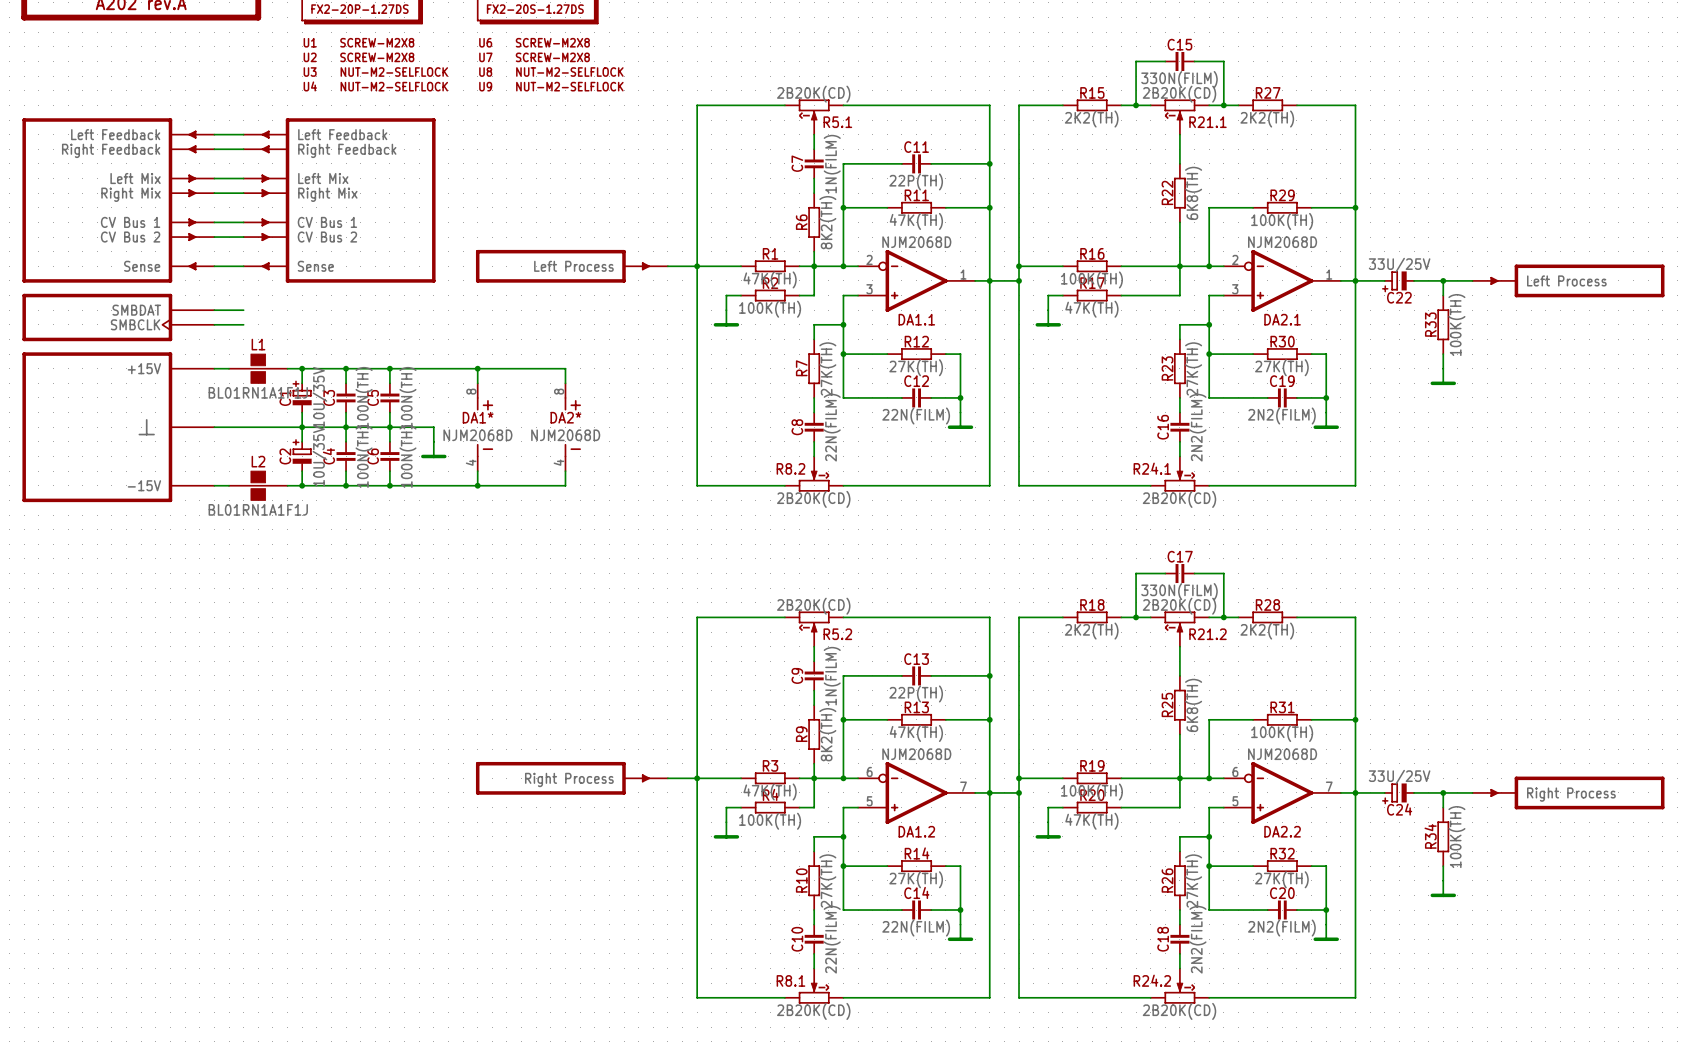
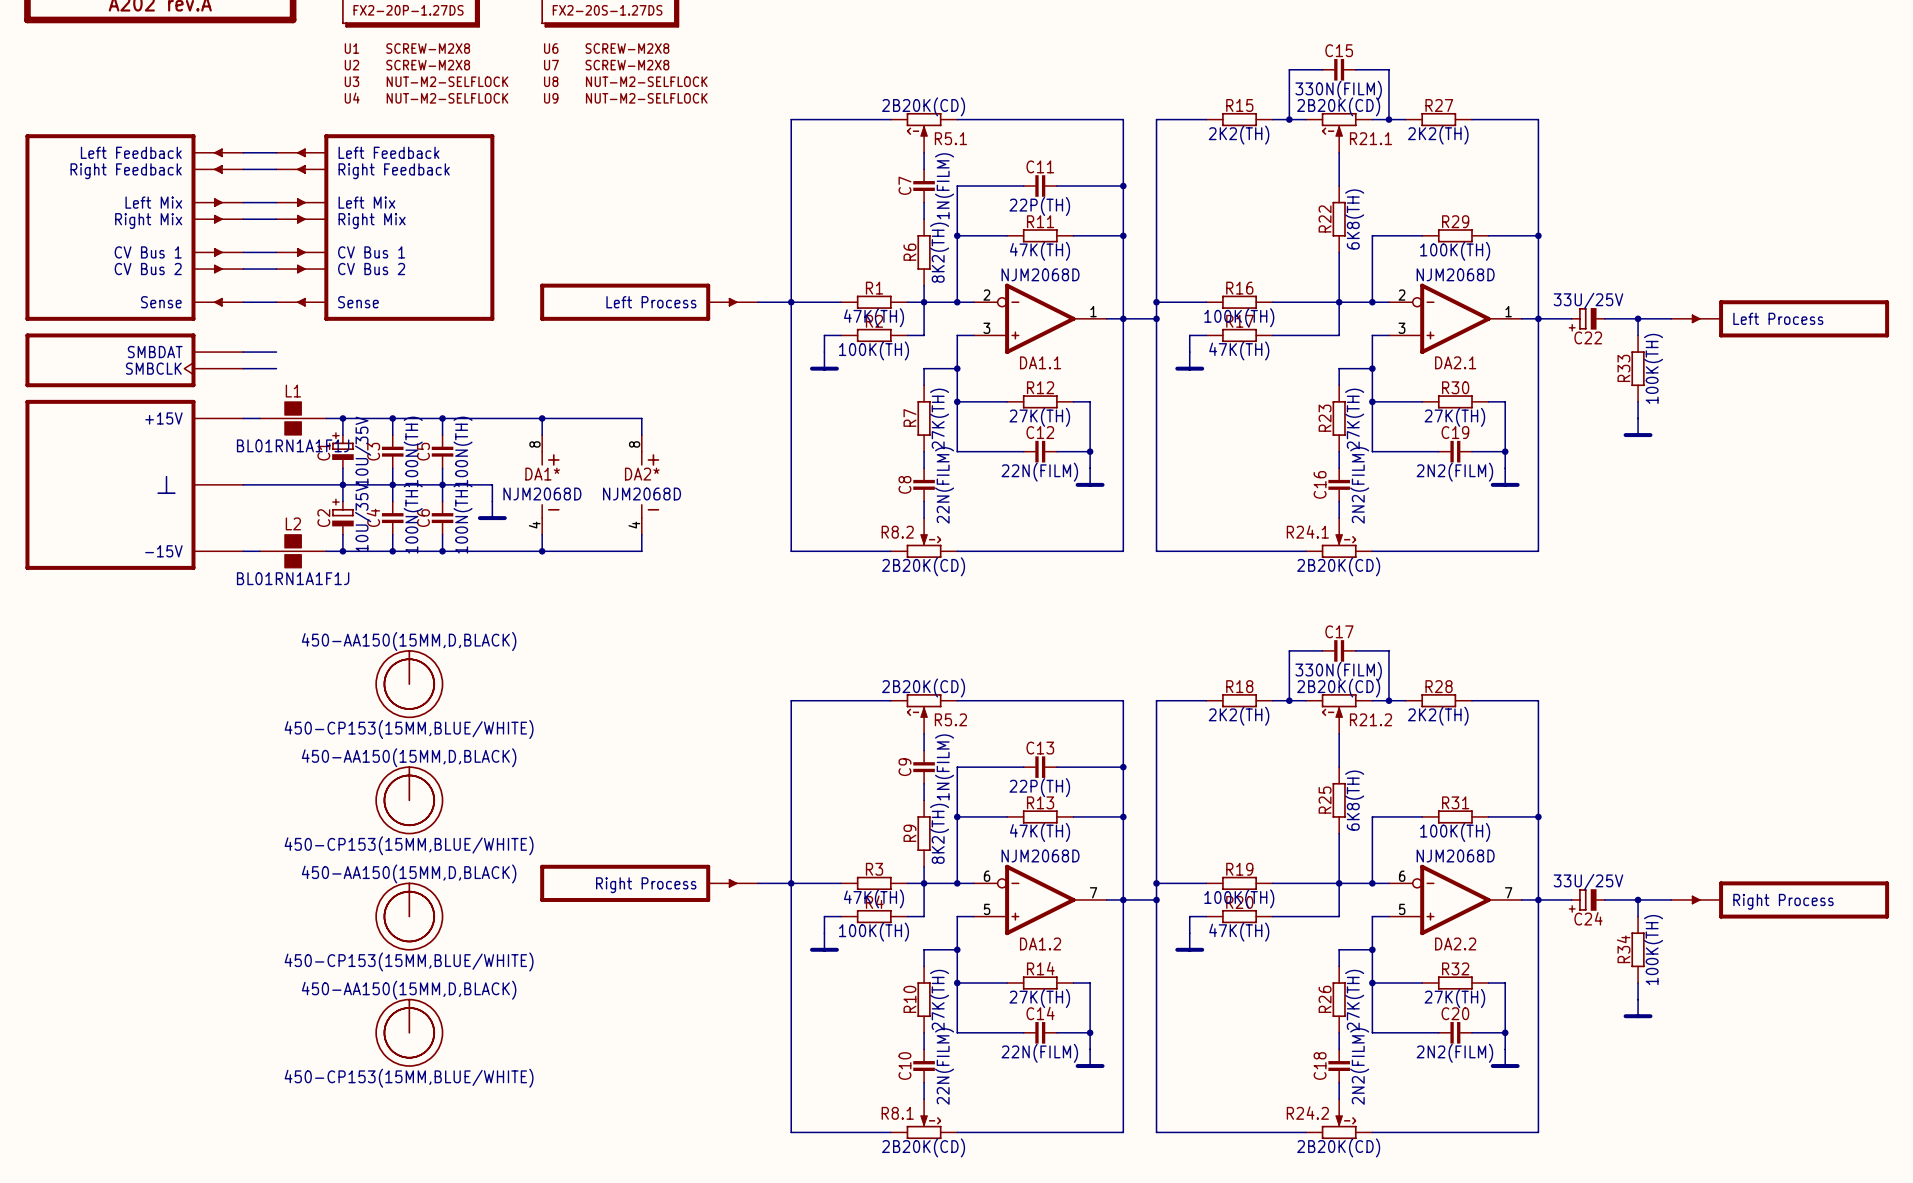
part: none -> 450-AA150(15MM,D,BLACK) (409, 684)
part: none -> 450-CP153(15MM,BLUE/WHITE) (409, 684)
part: none -> 450-AA150(15MM,D,BLACK) (409, 800)
part: none -> 450-CP153(15MM,BLUE/WHITE) (409, 800)
part: none -> 450-AA150(15MM,D,BLACK) (409, 916)
part: none -> 450-CP153(15MM,BLUE/WHITE) (409, 916)
part: none -> 450-AA150(15MM,D,BLACK) (409, 1032)
part: none -> 450-CP153(15MM,BLUE/WHITE) (409, 1032)

